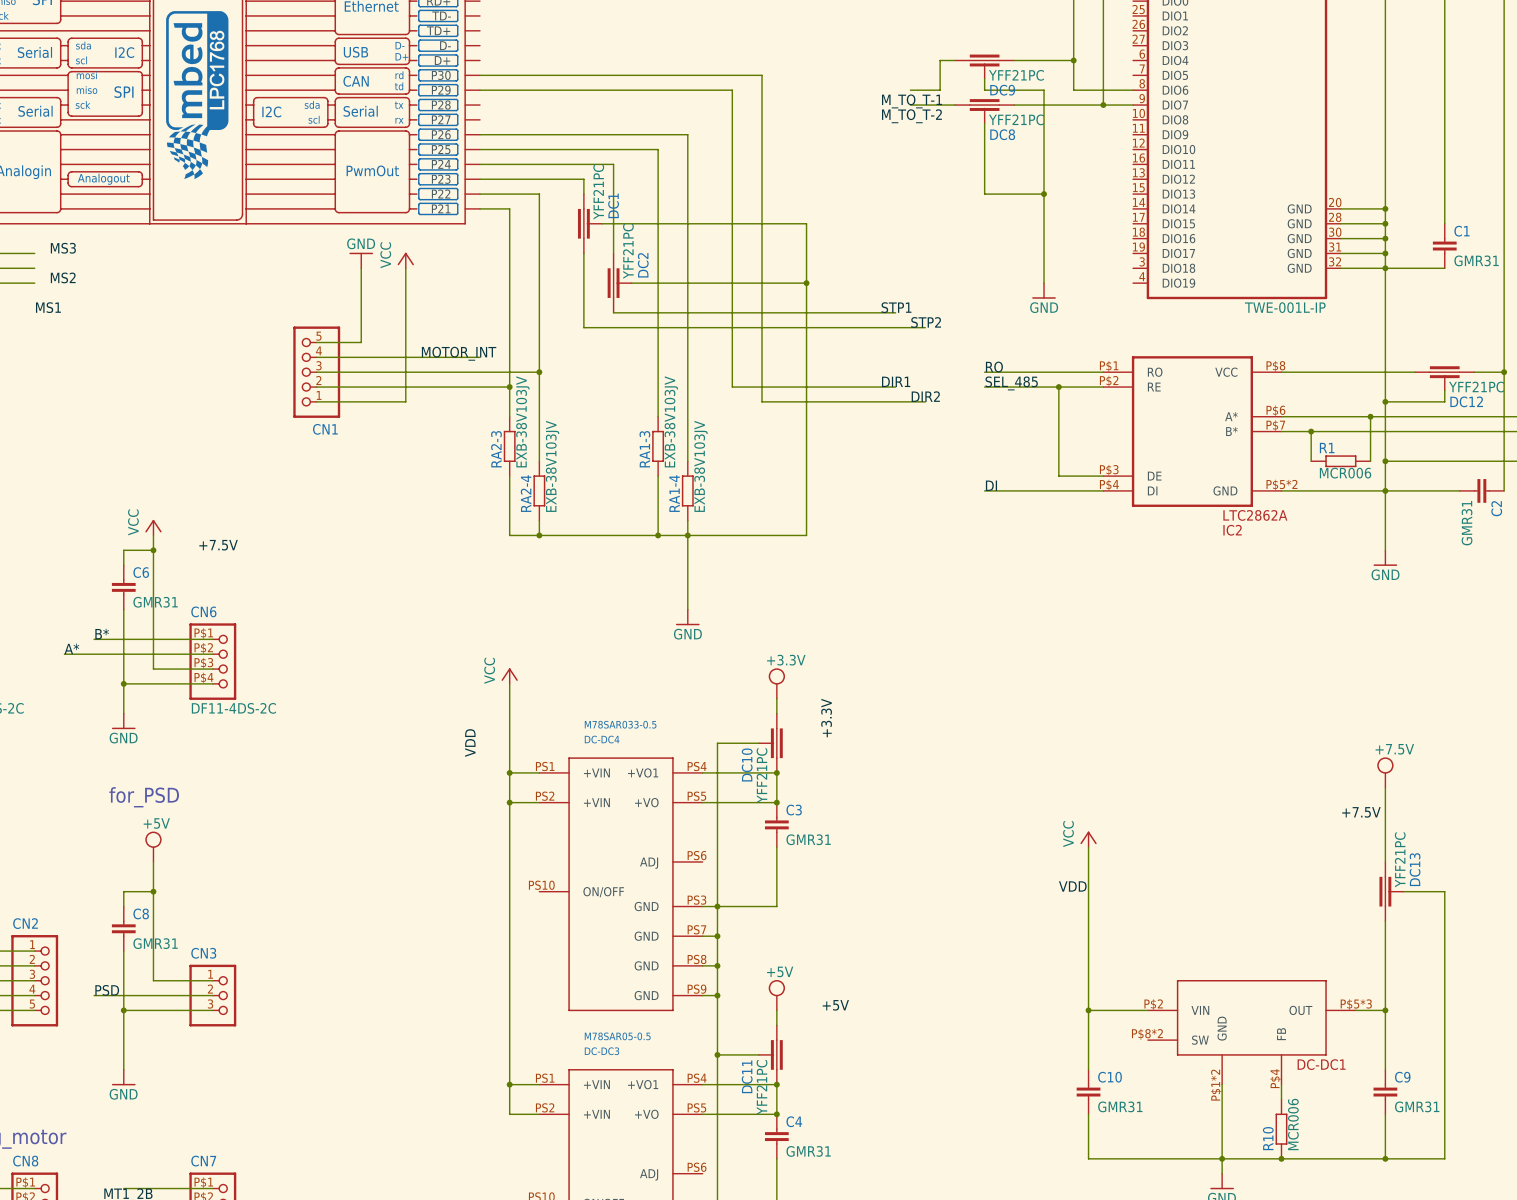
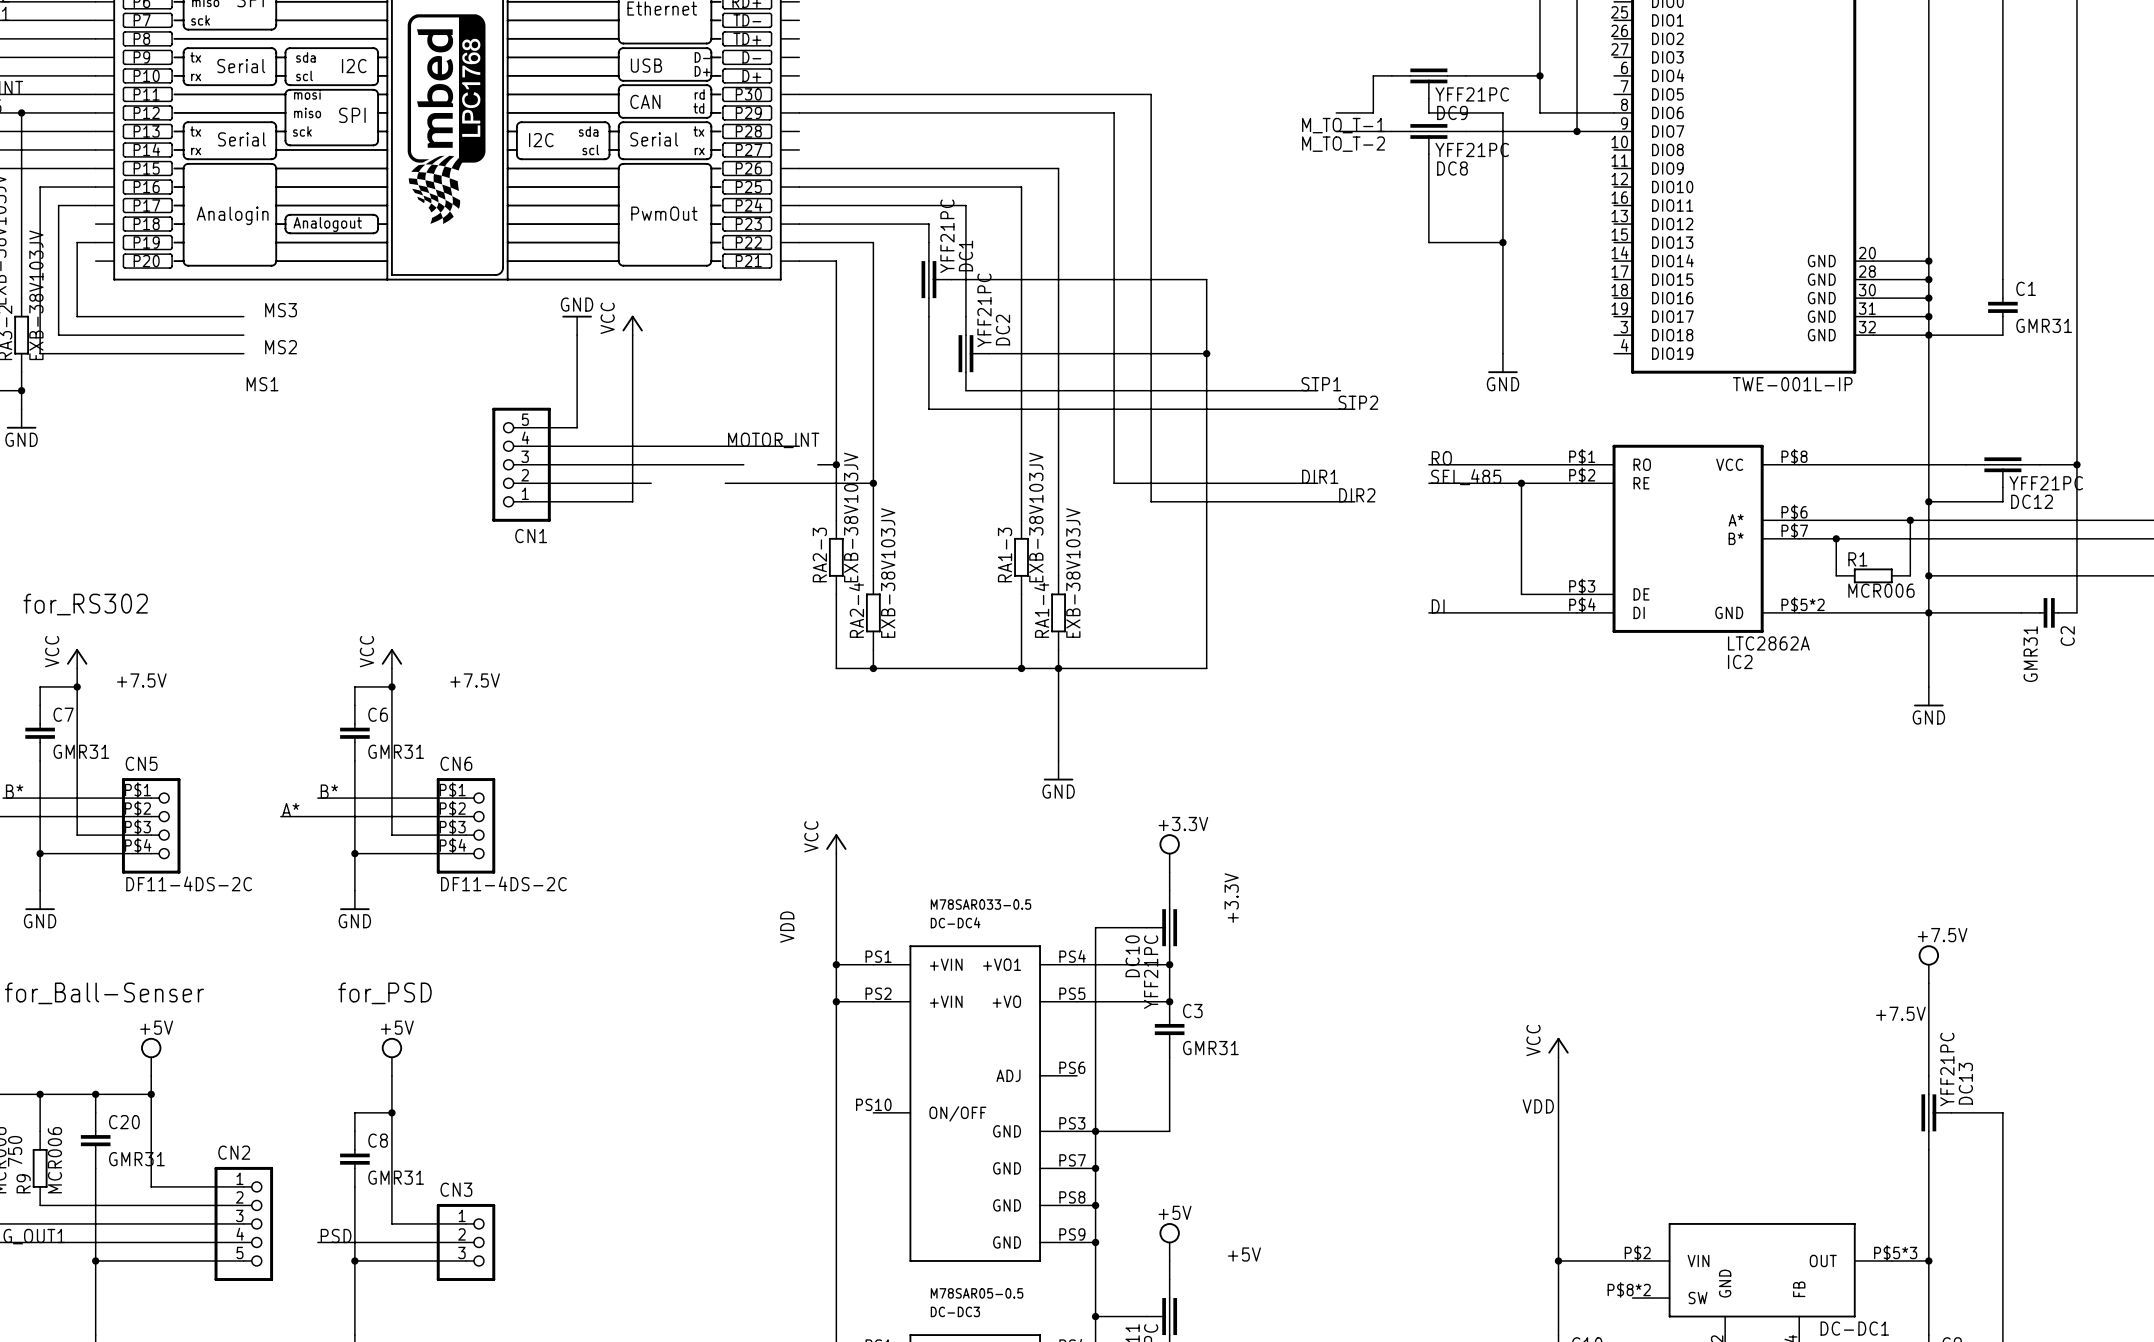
power symbol position: GND (361, 260) -> GND (577, 325)
power symbol position: VCC (405, 260) -> VCC (632, 325)
wire: (361, 268) (361, 342) (316, 342) -> (577, 335) (577, 427) (521, 427)
wire: (405, 268) (405, 401) (346, 401) -> (632, 335) (632, 501)
wire: none -> (521, 446) (595, 446)
wire: none -> (521, 464) (595, 464)
CN1 position: (316, 372) -> (521, 464)
wire: (435, 372) (494, 372) -> none
wire: (509, 372) (539, 372) -> (836, 483) (873, 483)
junction: none -> (836, 464)
junction: (539, 372) -> none
wire: (361, 387) (420, 387) -> (521, 483) (595, 483)
junction: (509, 387) -> none
junction: none -> (873, 483)
wire: none -> (521, 501) (595, 501)

